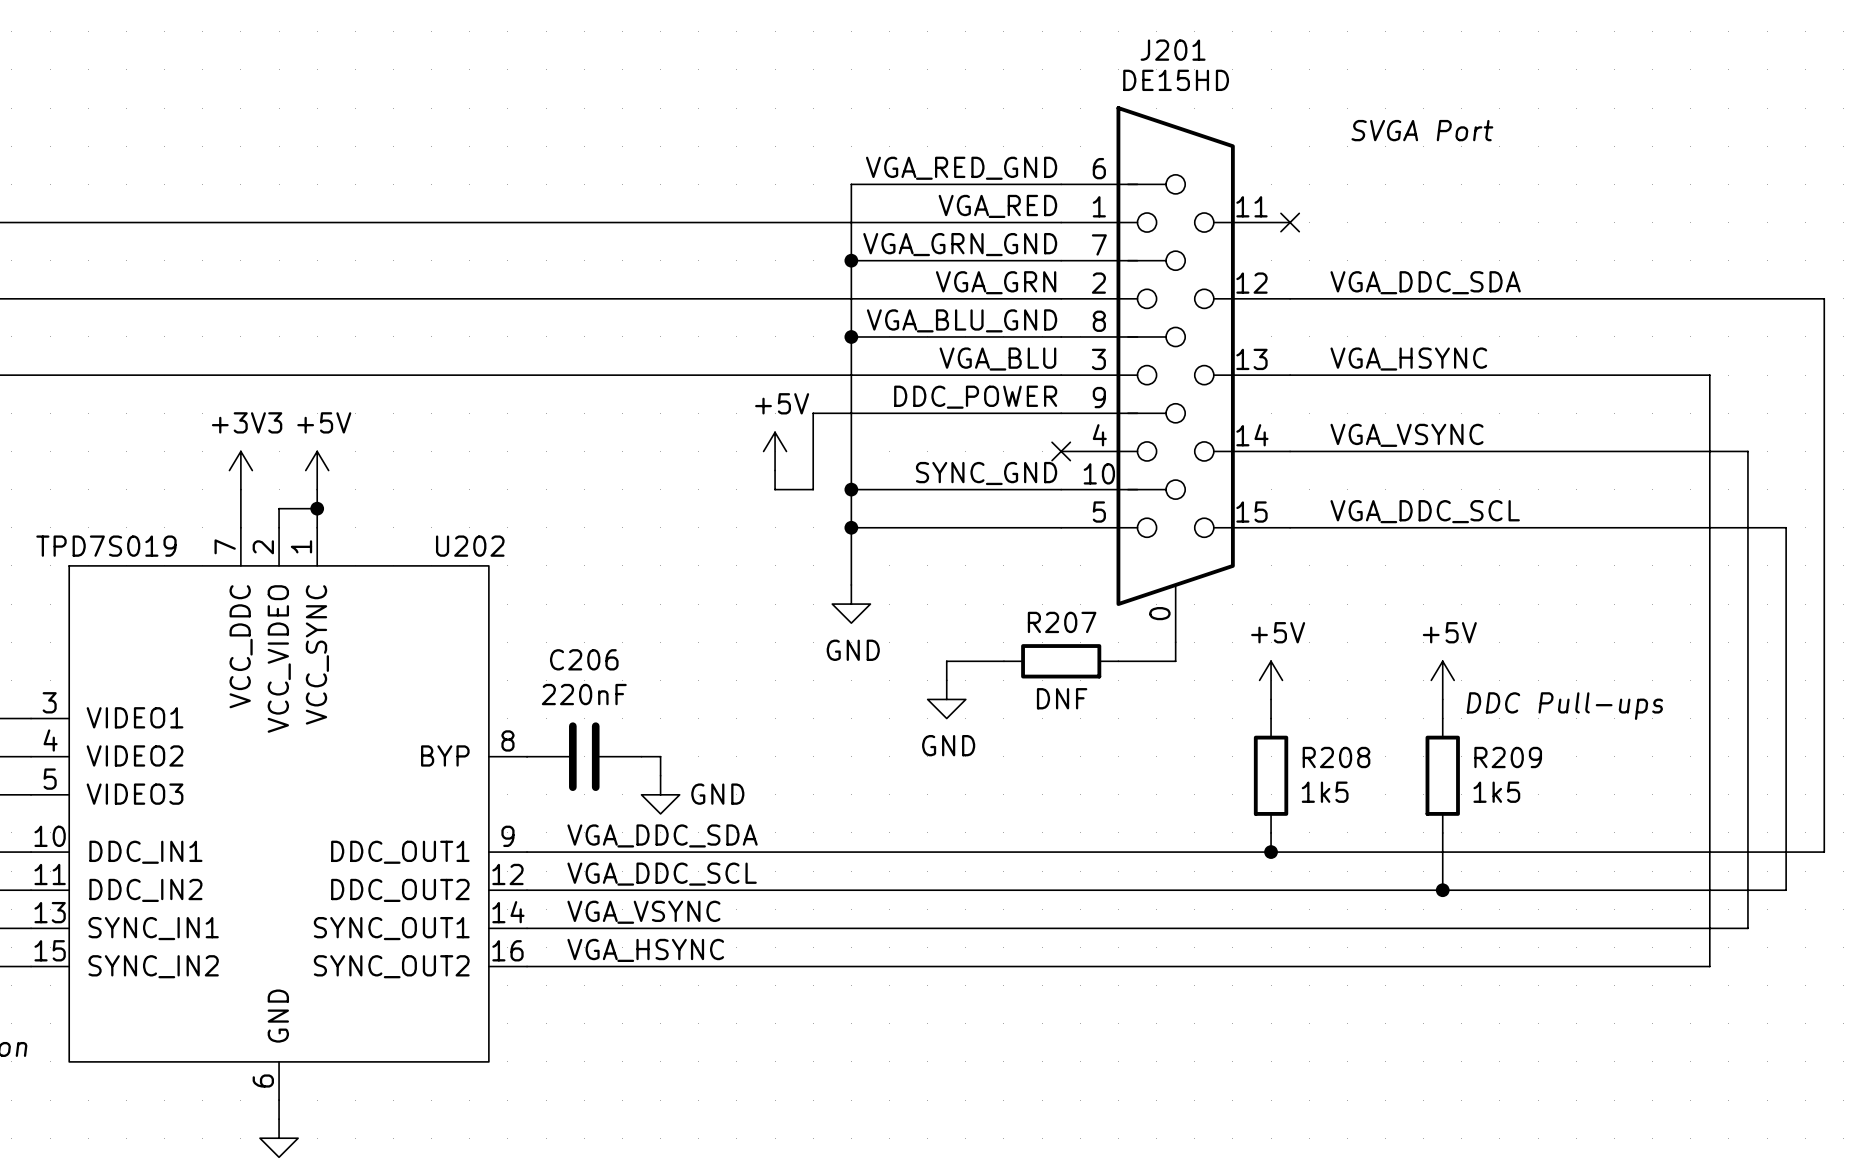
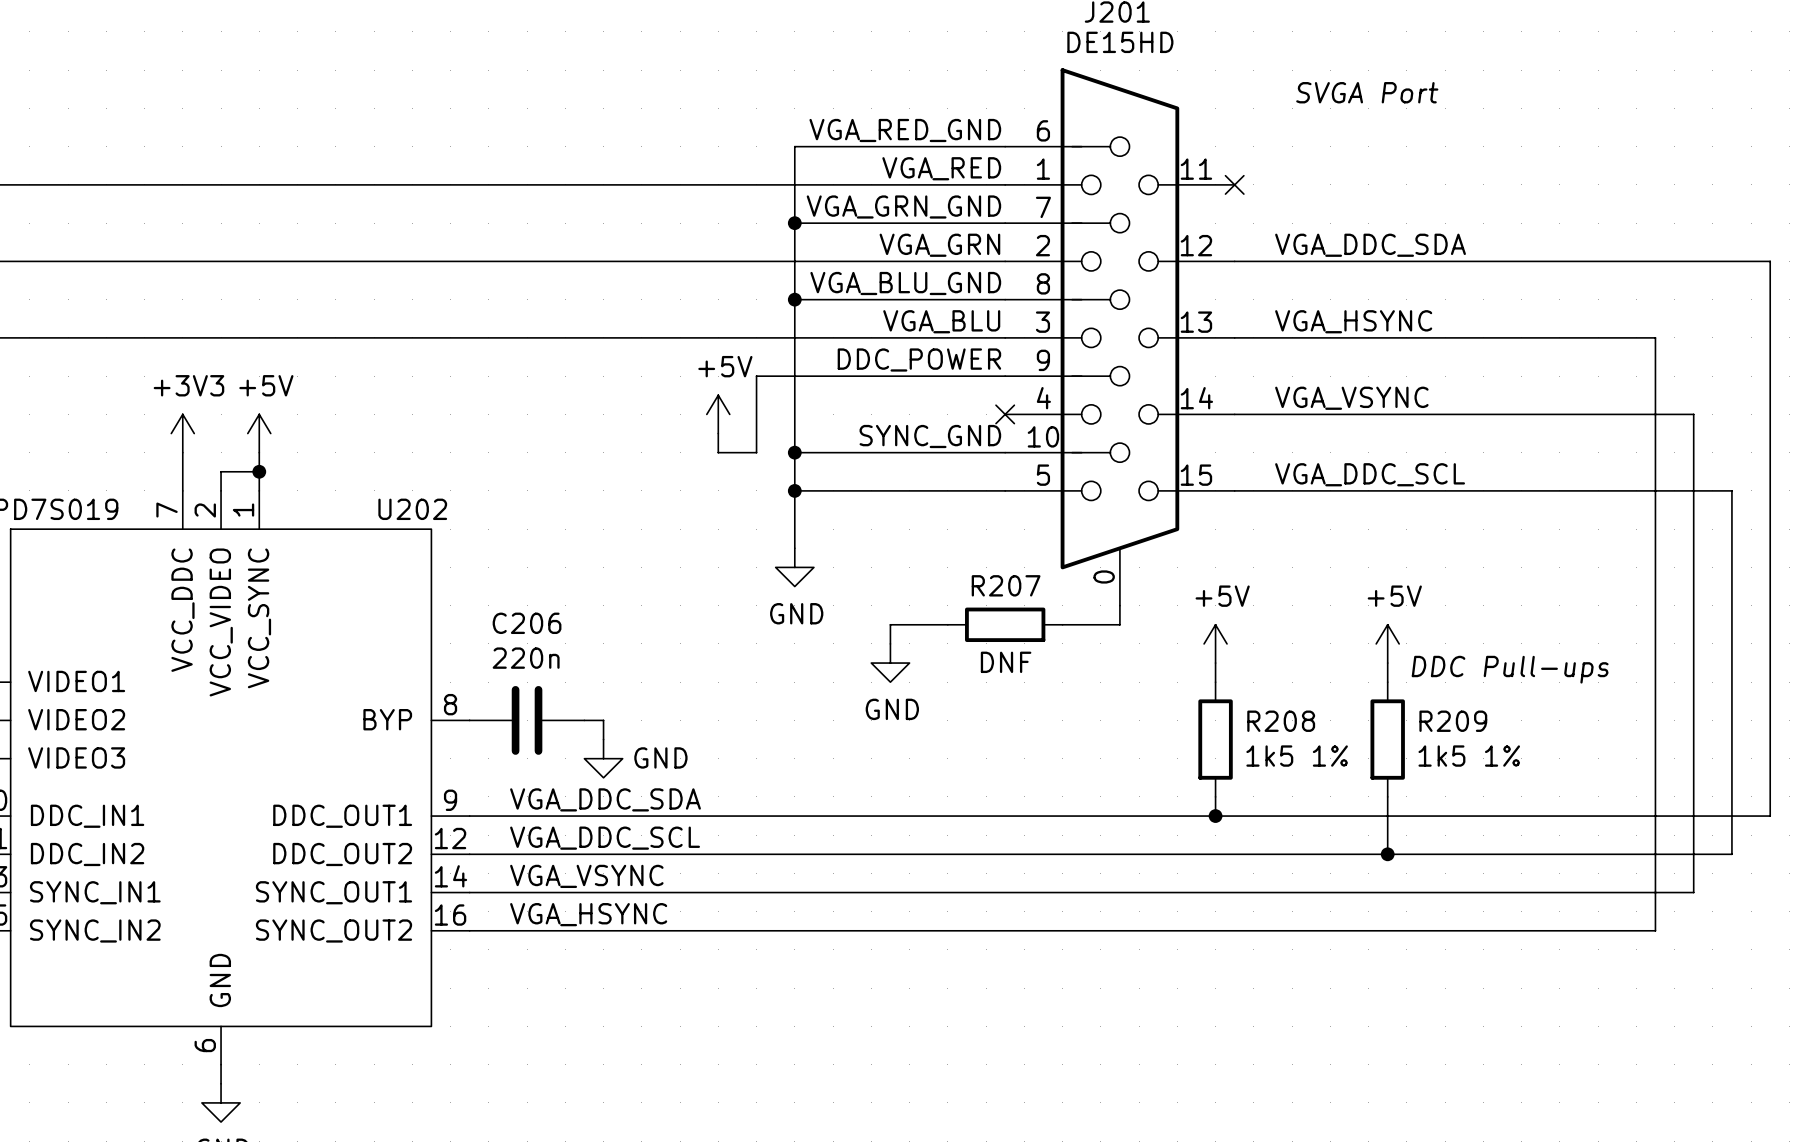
C206 value: 220nF (584, 694) -> 220n (526, 658)
R208 value: 1k5 (1325, 792) -> 1k5 1% (1297, 756)
R209 value: 1k5 (1496, 792) -> 1k5 1% (1469, 756)

